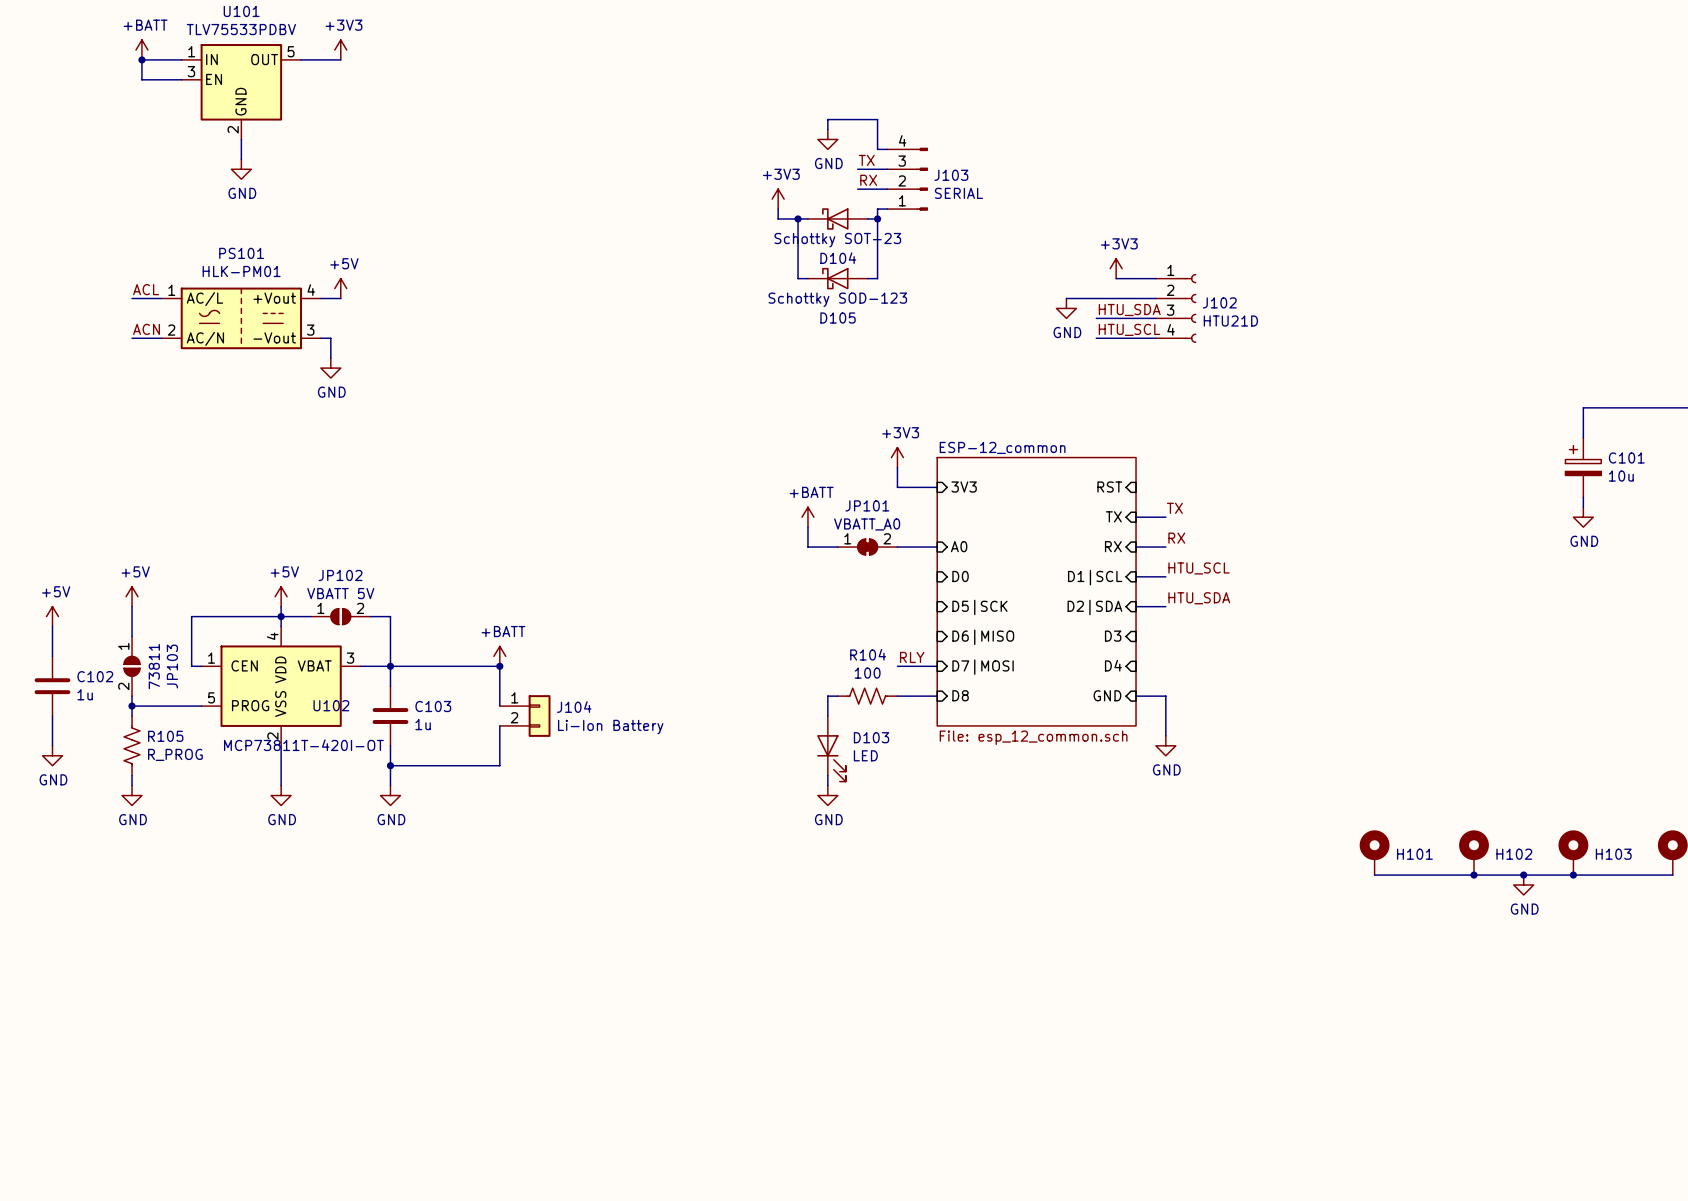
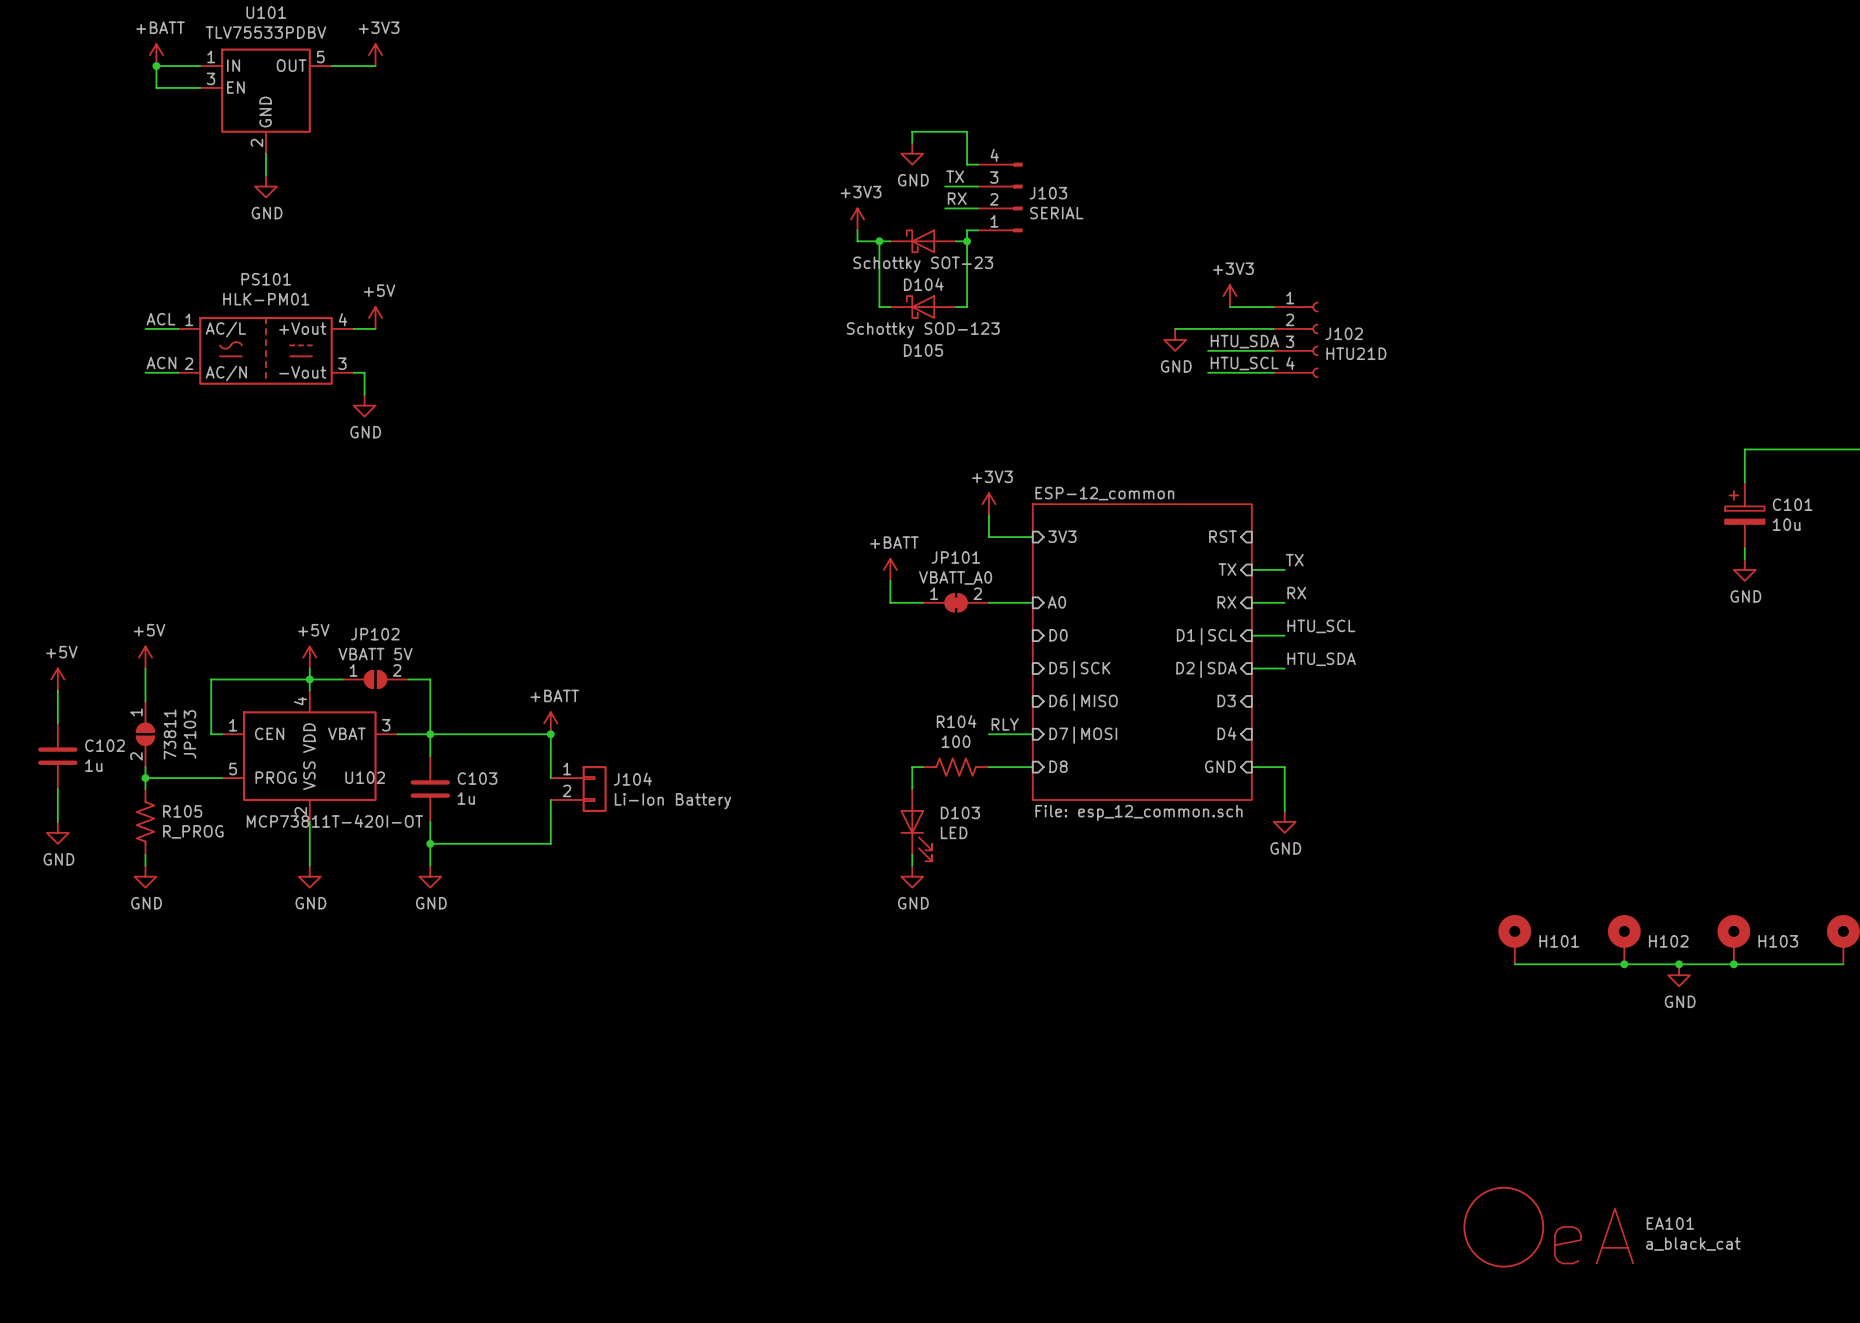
EA101: none -> a_black_cat (1503, 1227)

